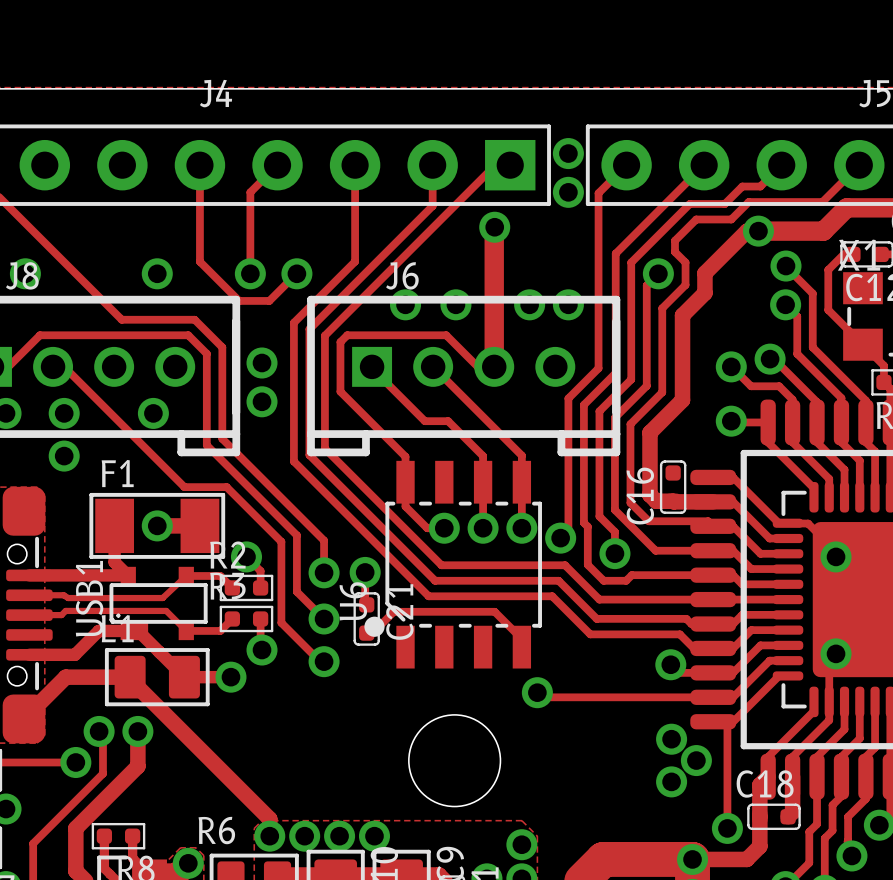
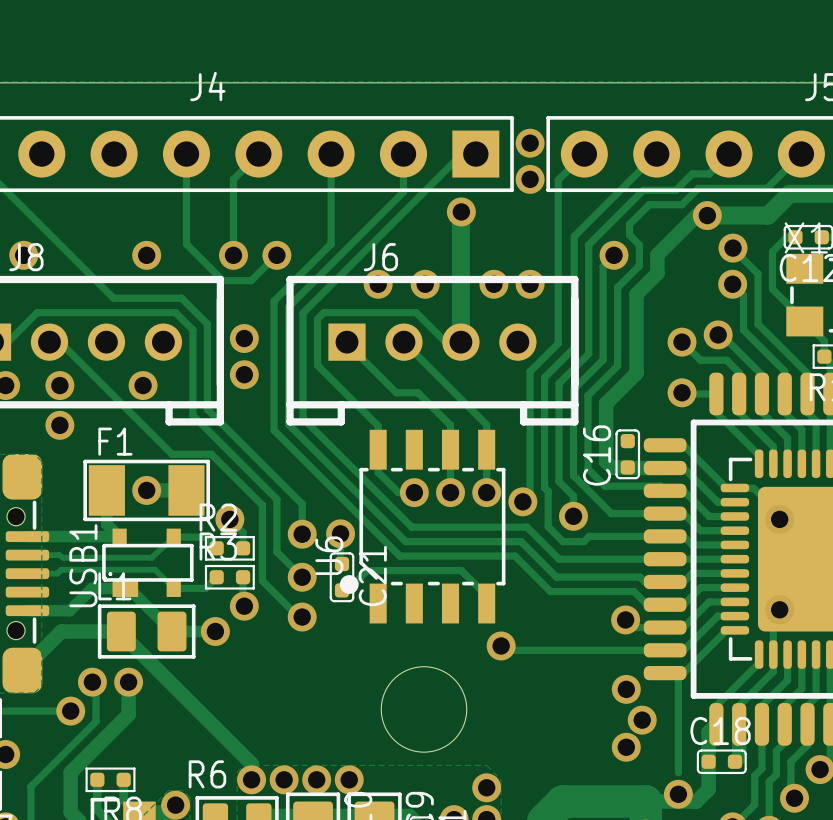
via: (696, 760) -> none
via: none -> (642, 720)
via: (671, 781) -> none
via: none -> (626, 747)
via position: (727, 828) -> (678, 794)
via: (692, 859) -> none

